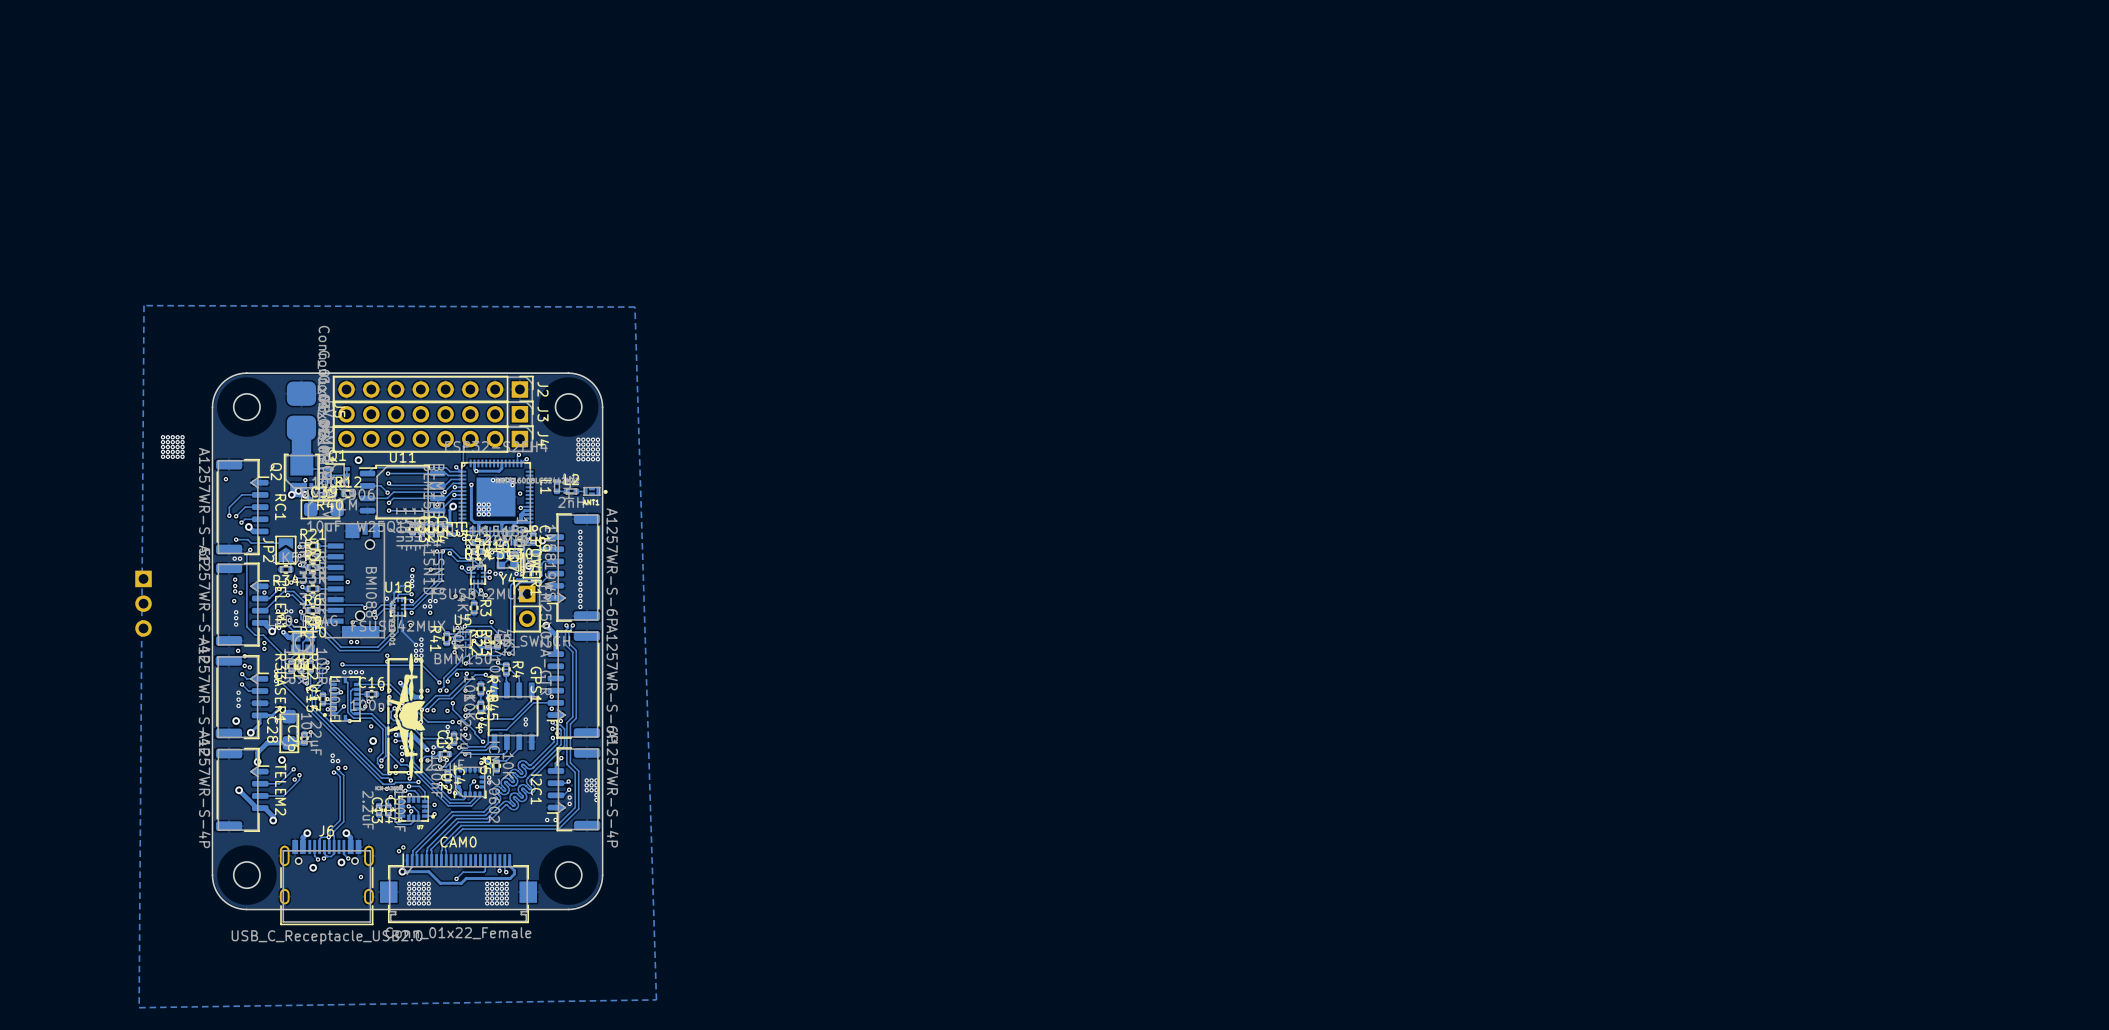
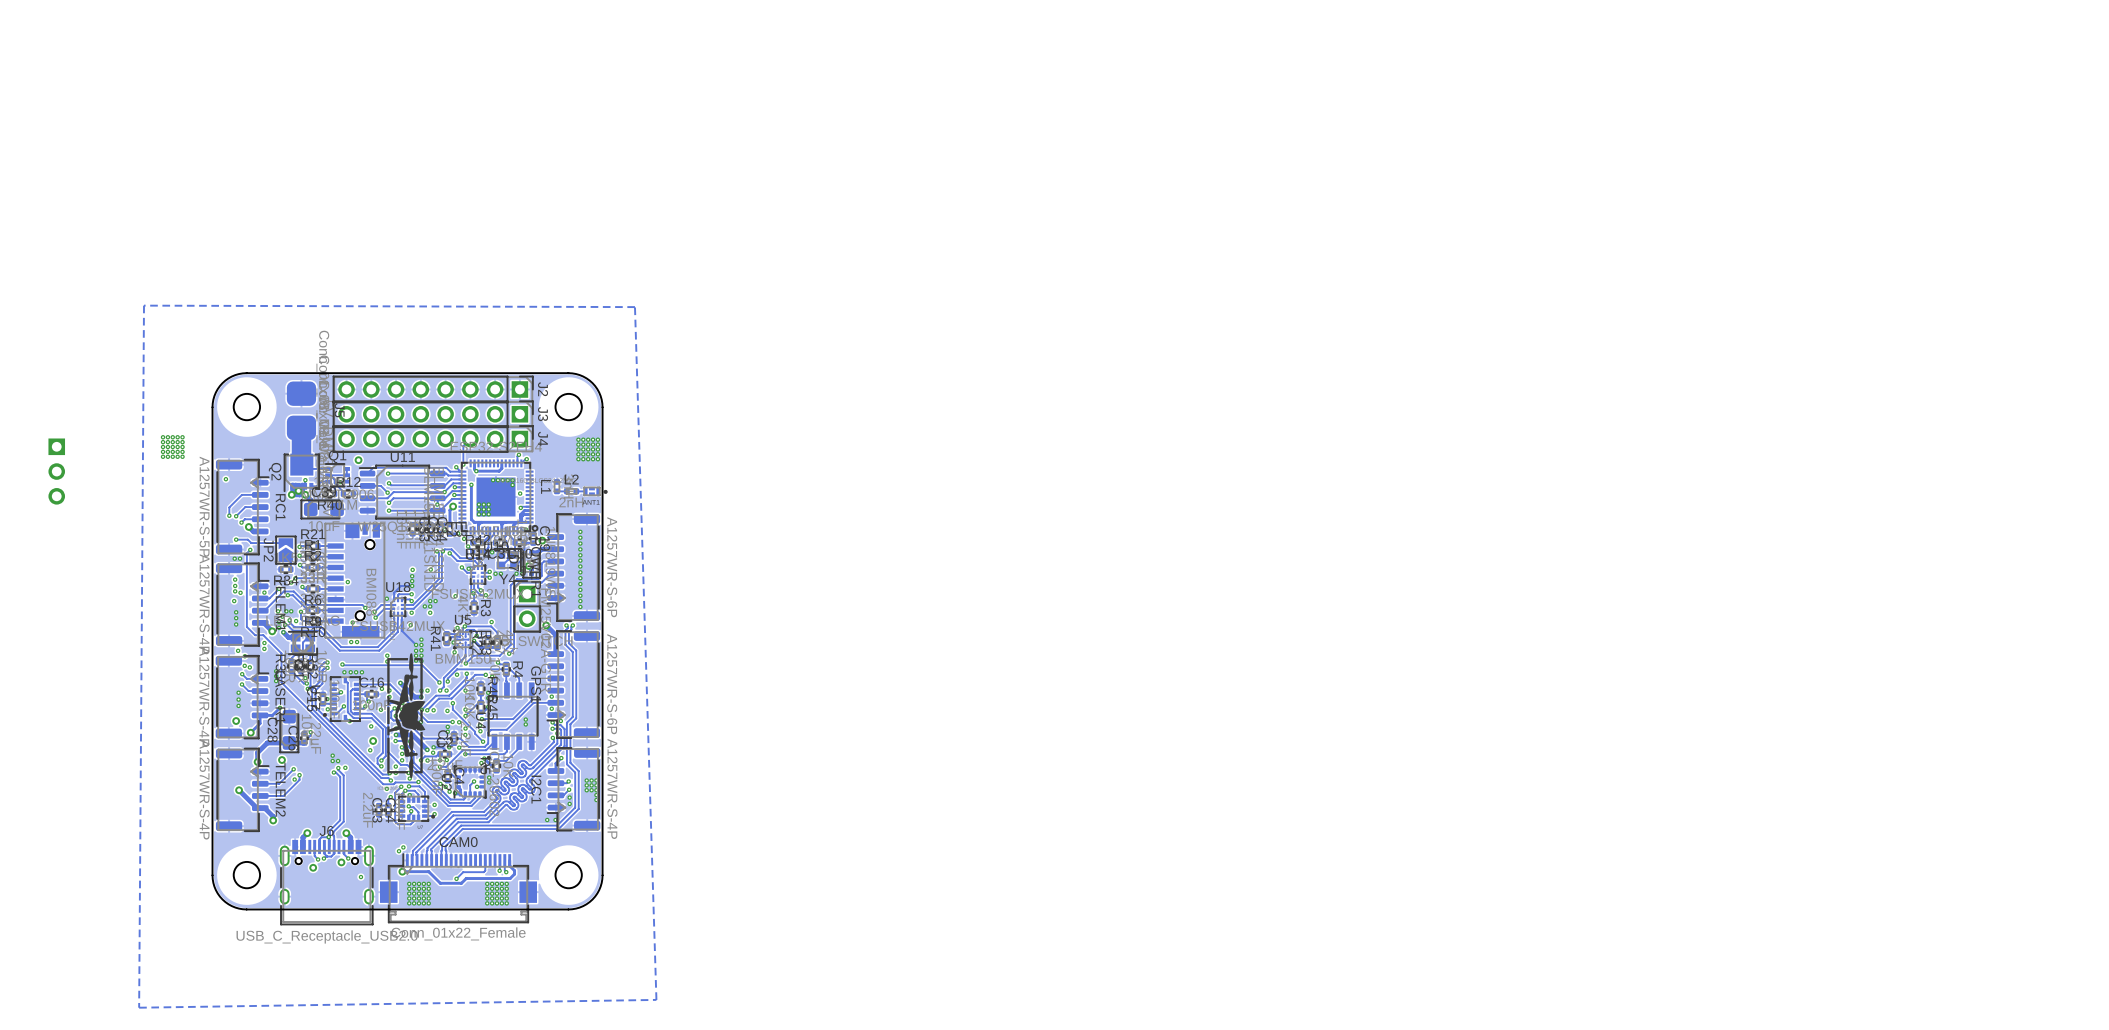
part position: (143, 603) -> (56, 471)

